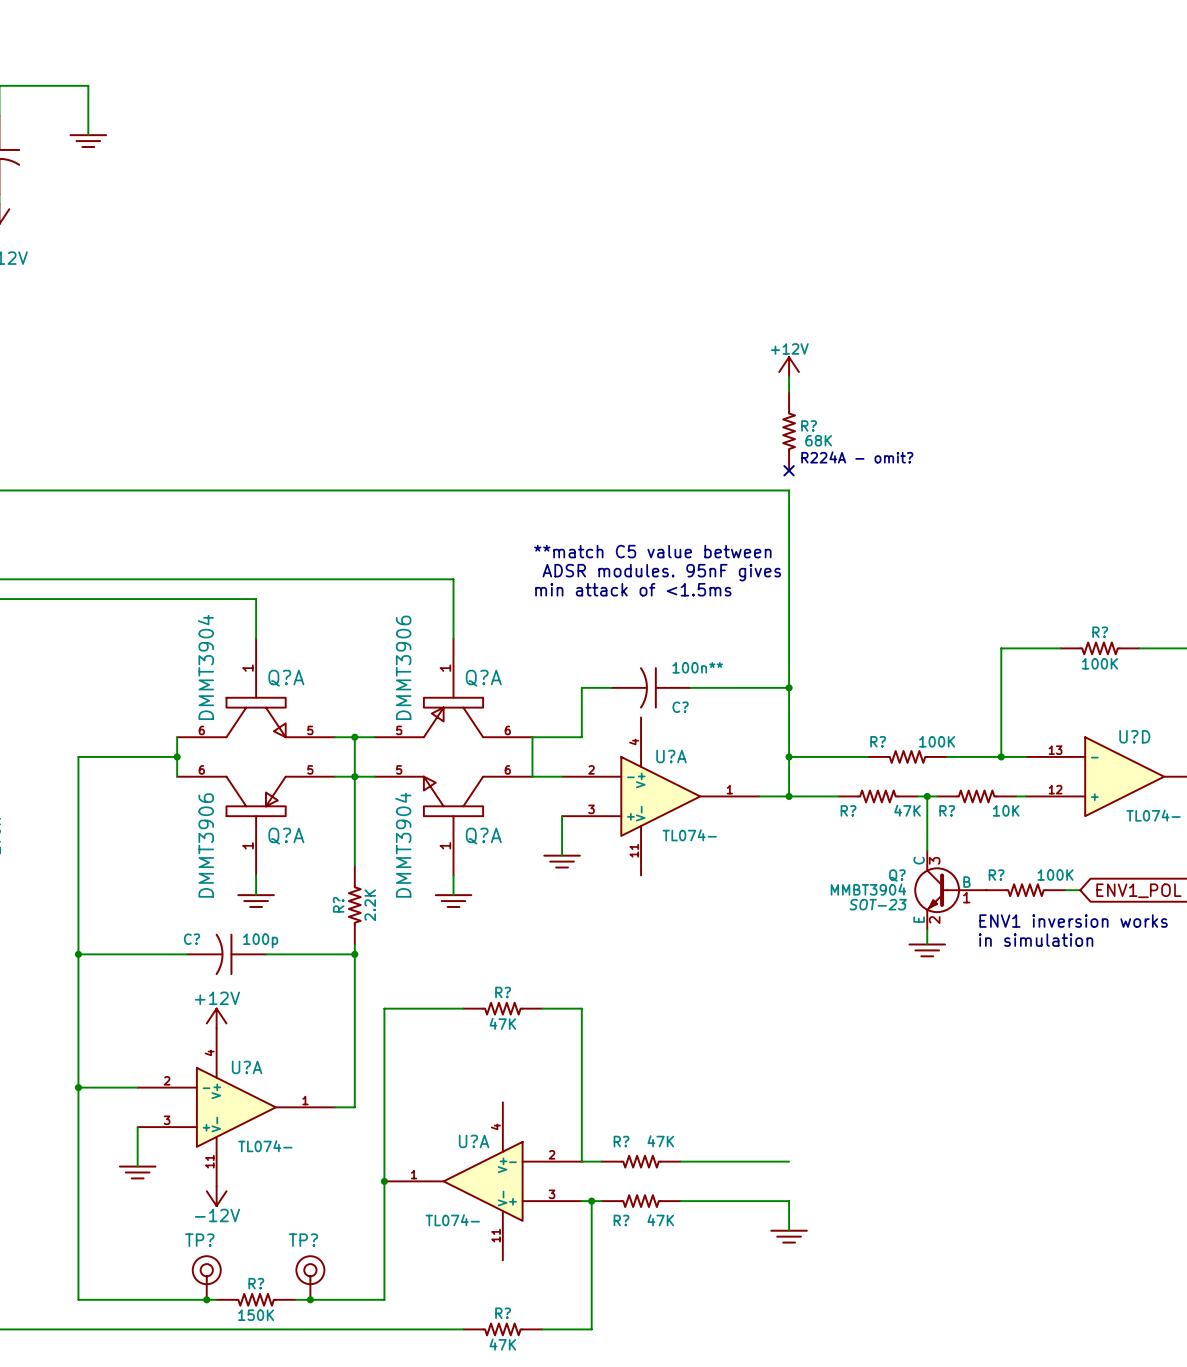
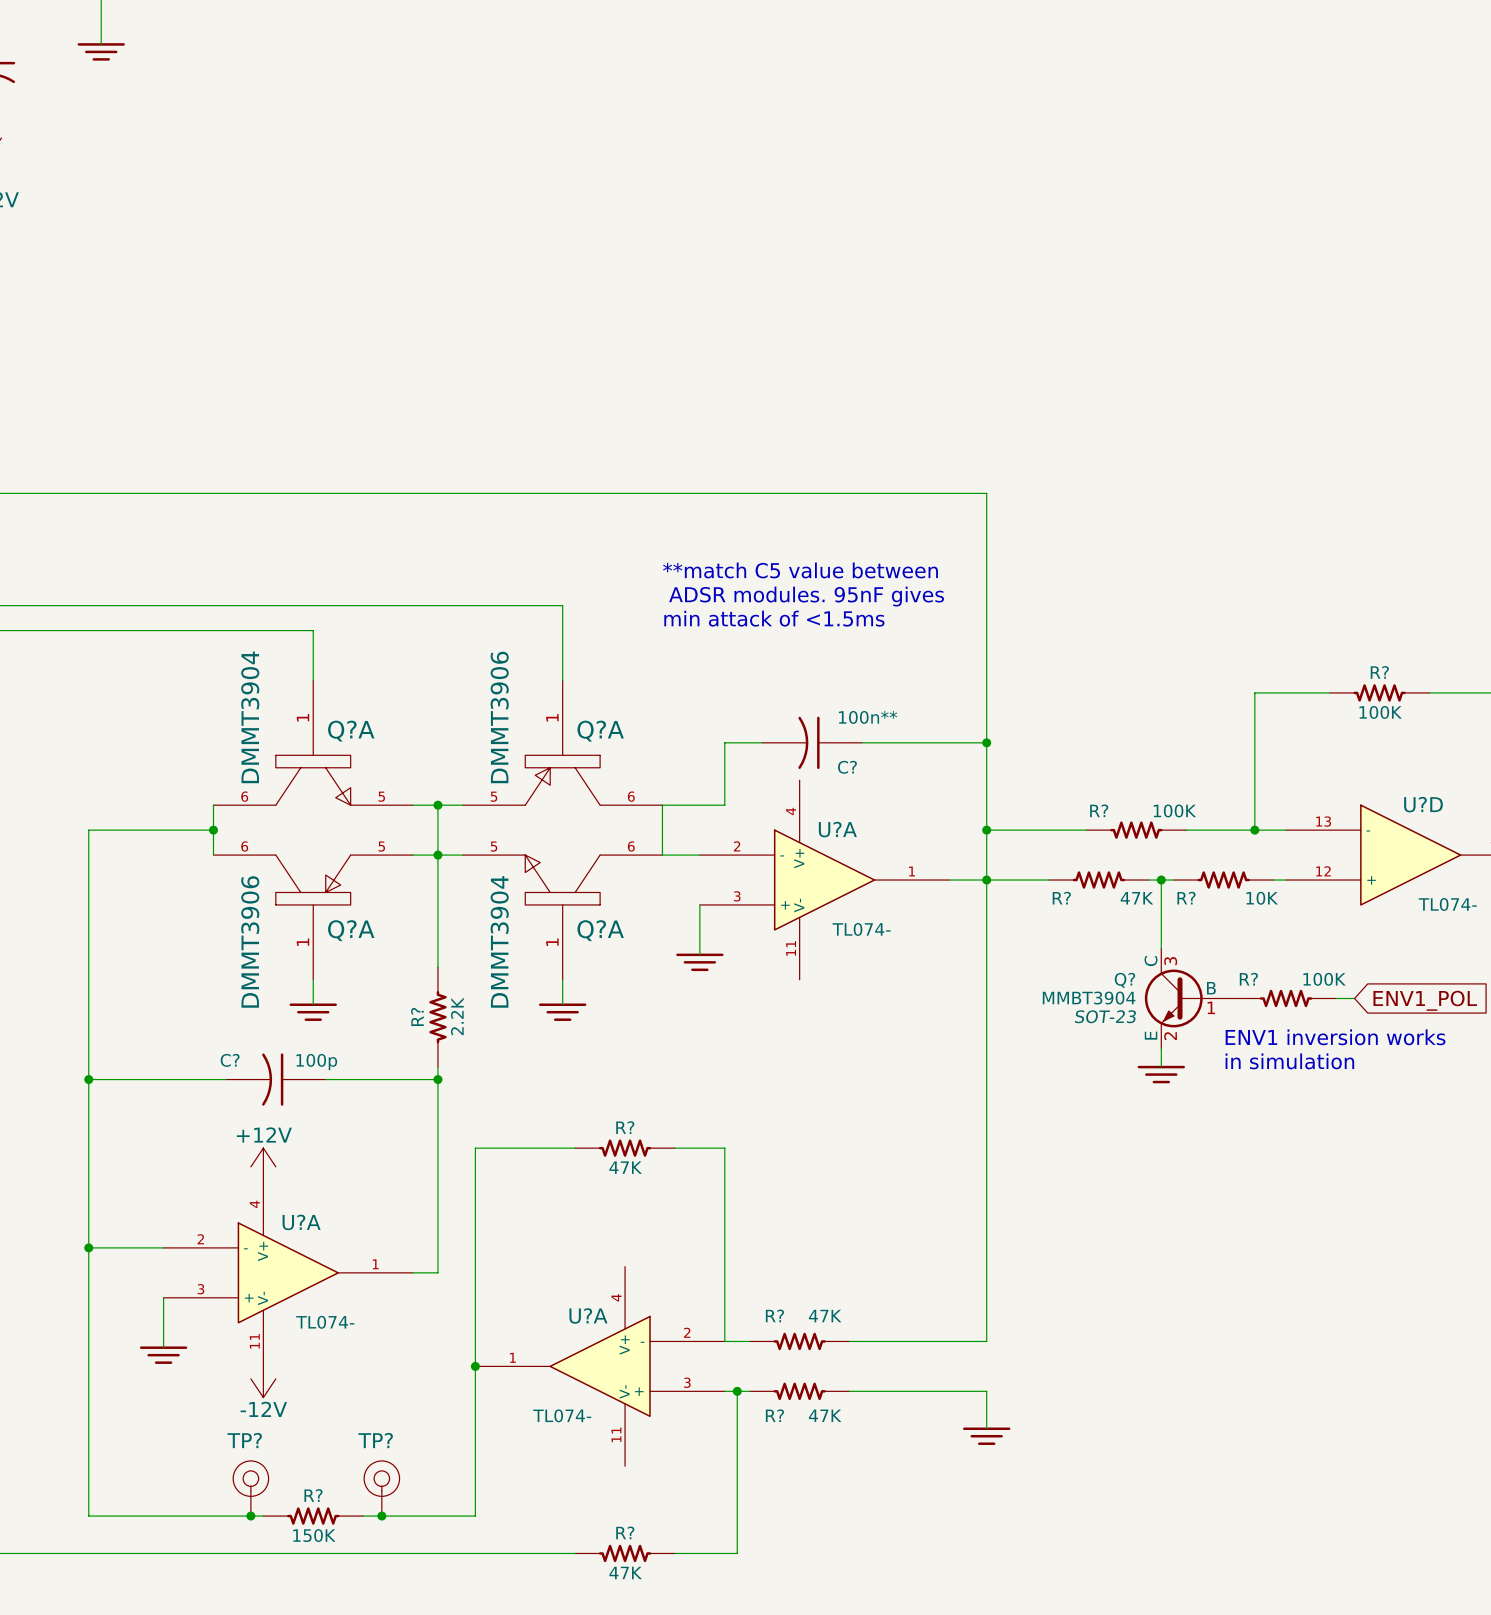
power symbol: +12V (789, 367) -> none
wire: (789, 376) (789, 391) -> none
R?: 68K (789, 431) -> none
text: R224A - omit? (857, 457) -> none
no-connect mark: (789, 470) -> none
wire: none -> (986, 880) (986, 1341)

